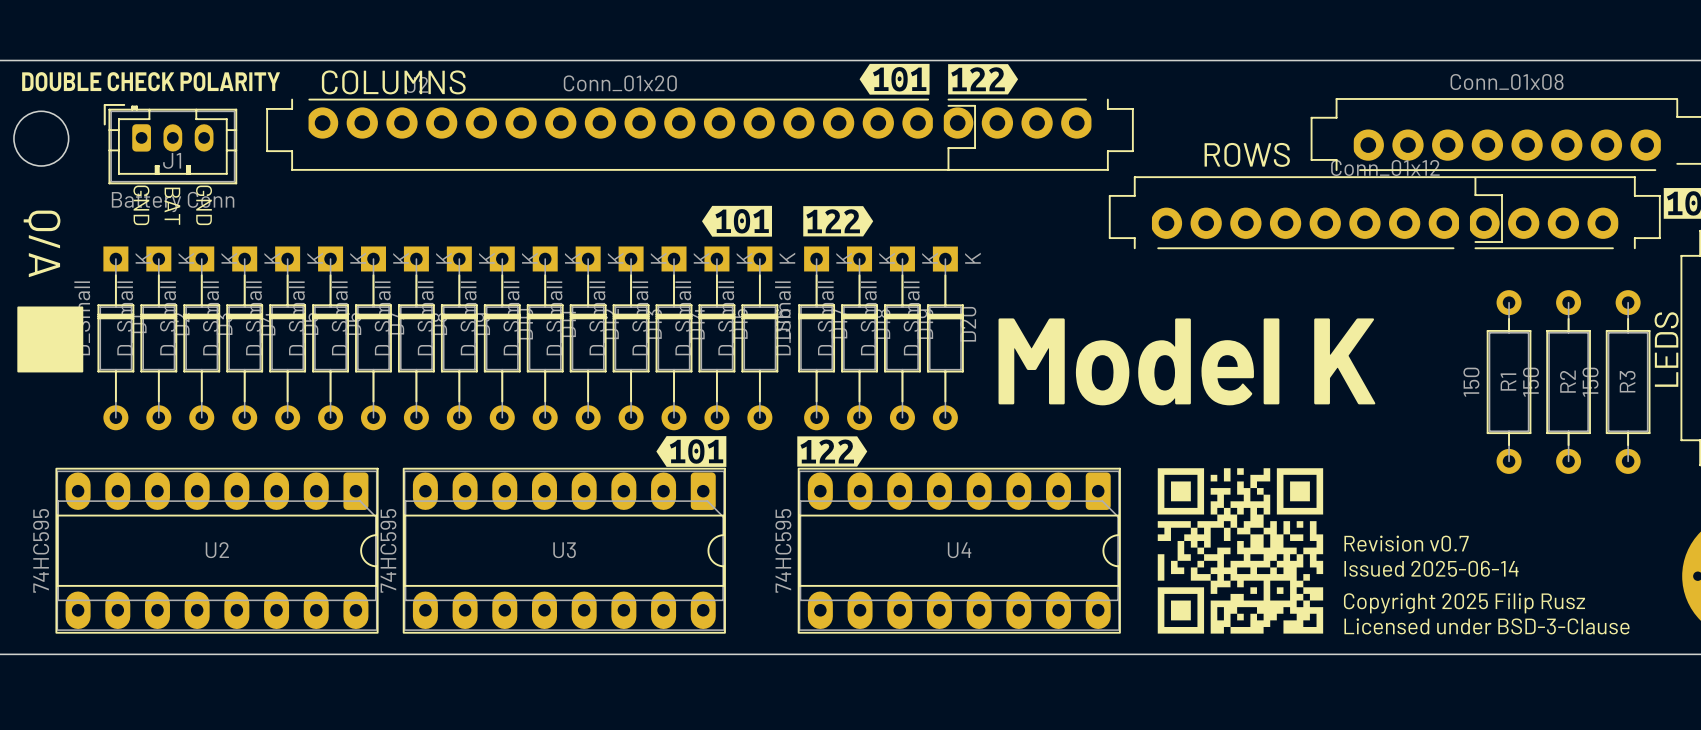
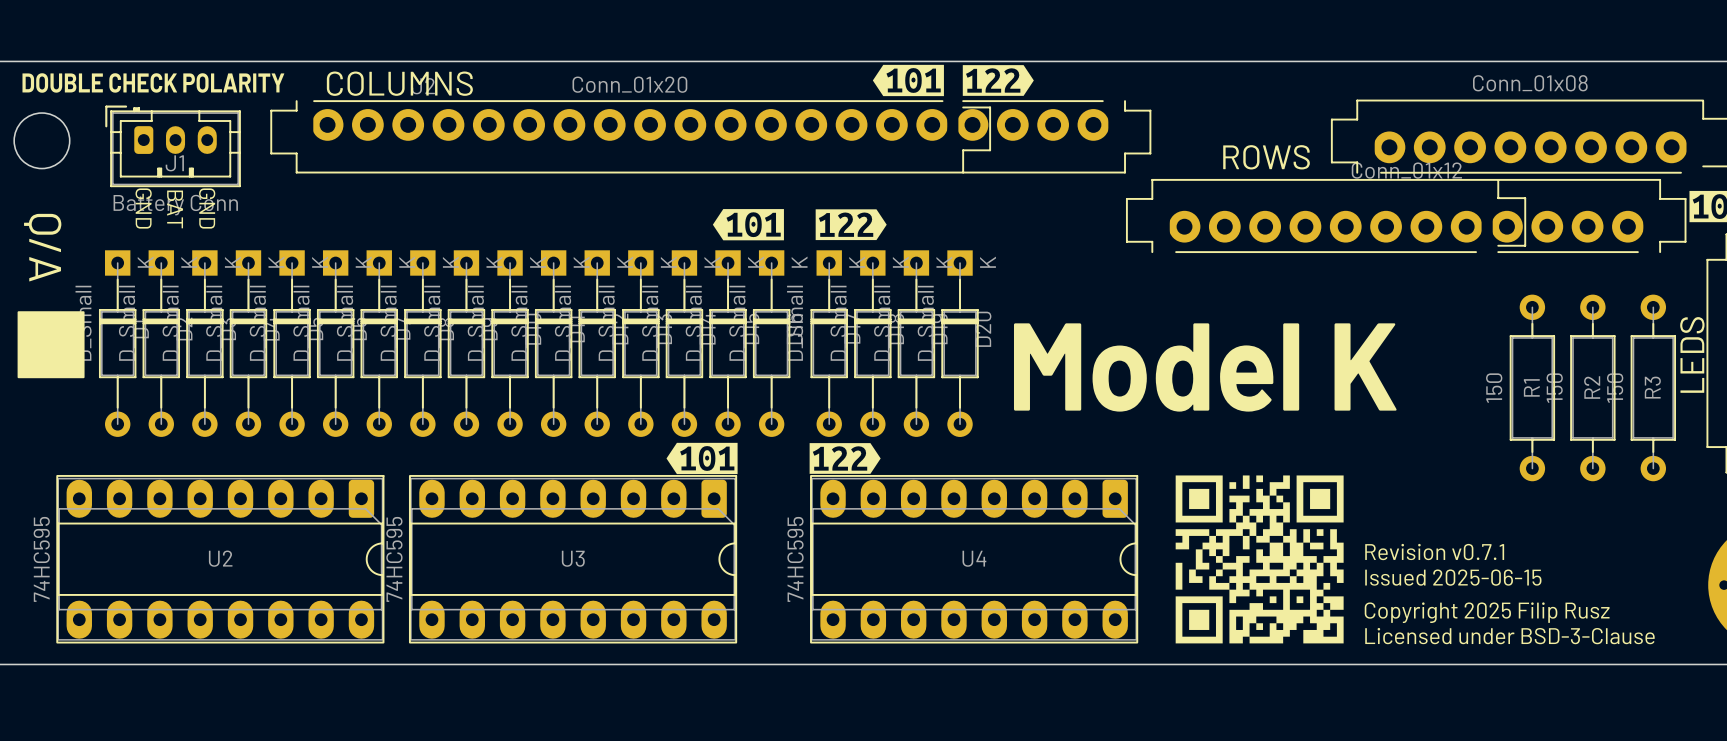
text: Revision v0.7 (1406, 543) -> Revision v0.7.1 (1434, 552)
text: Issued 2025-06-14 (1431, 568) -> Issued 2025-06-15 (1453, 577)

